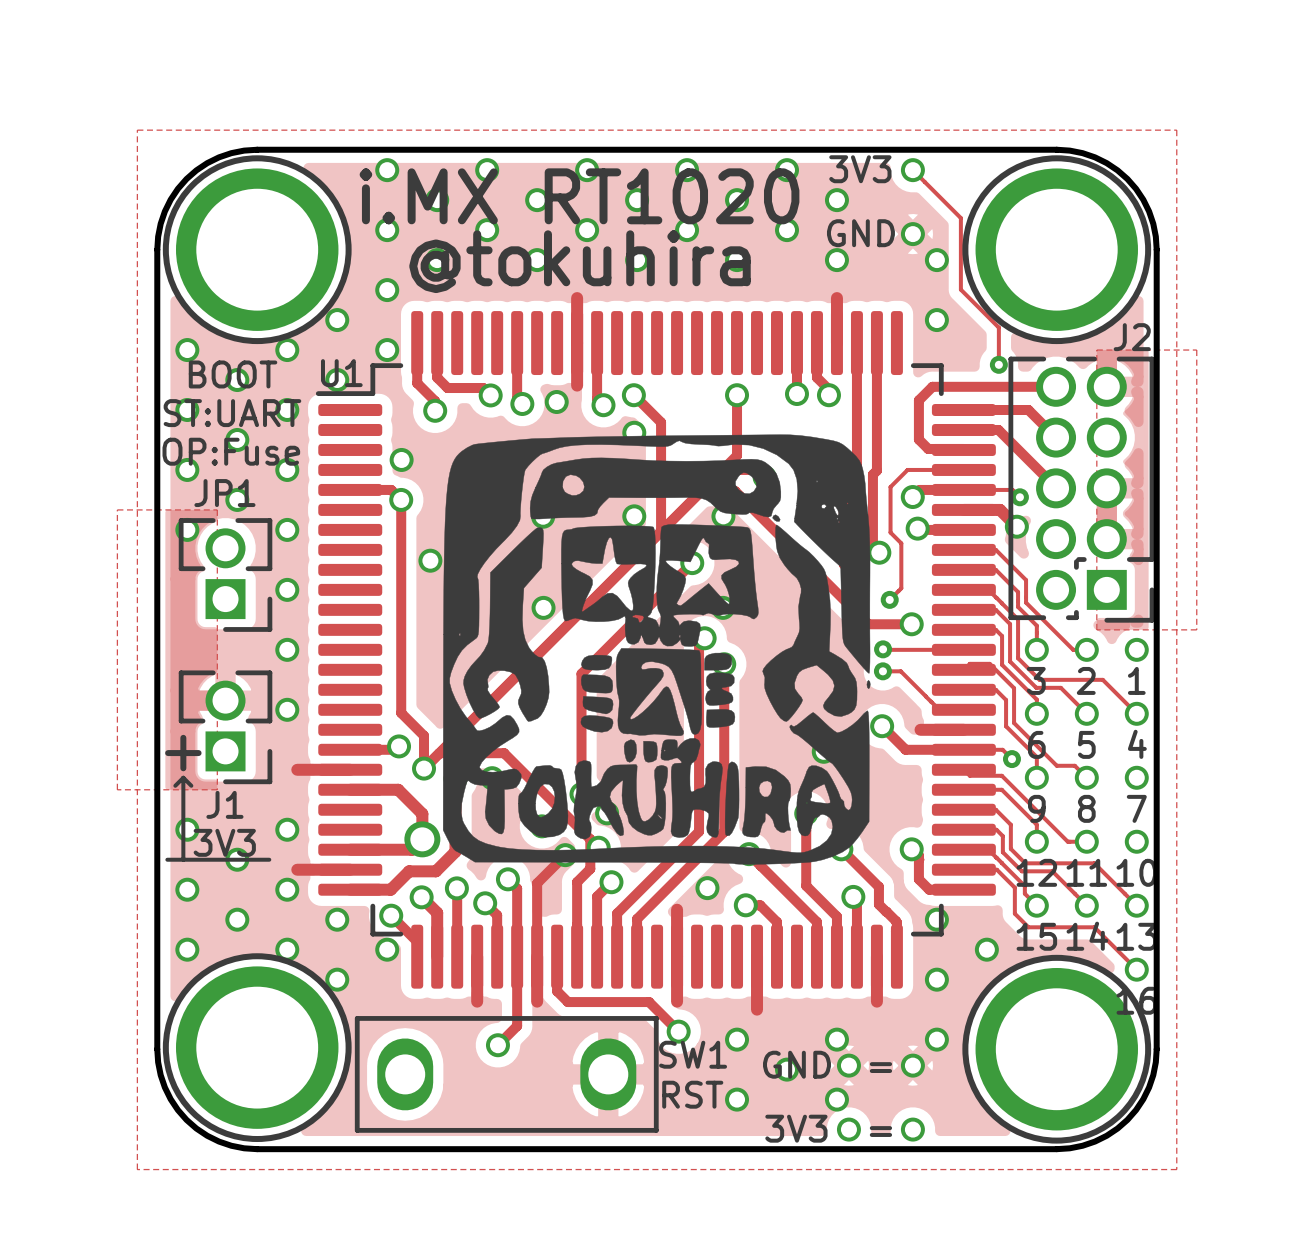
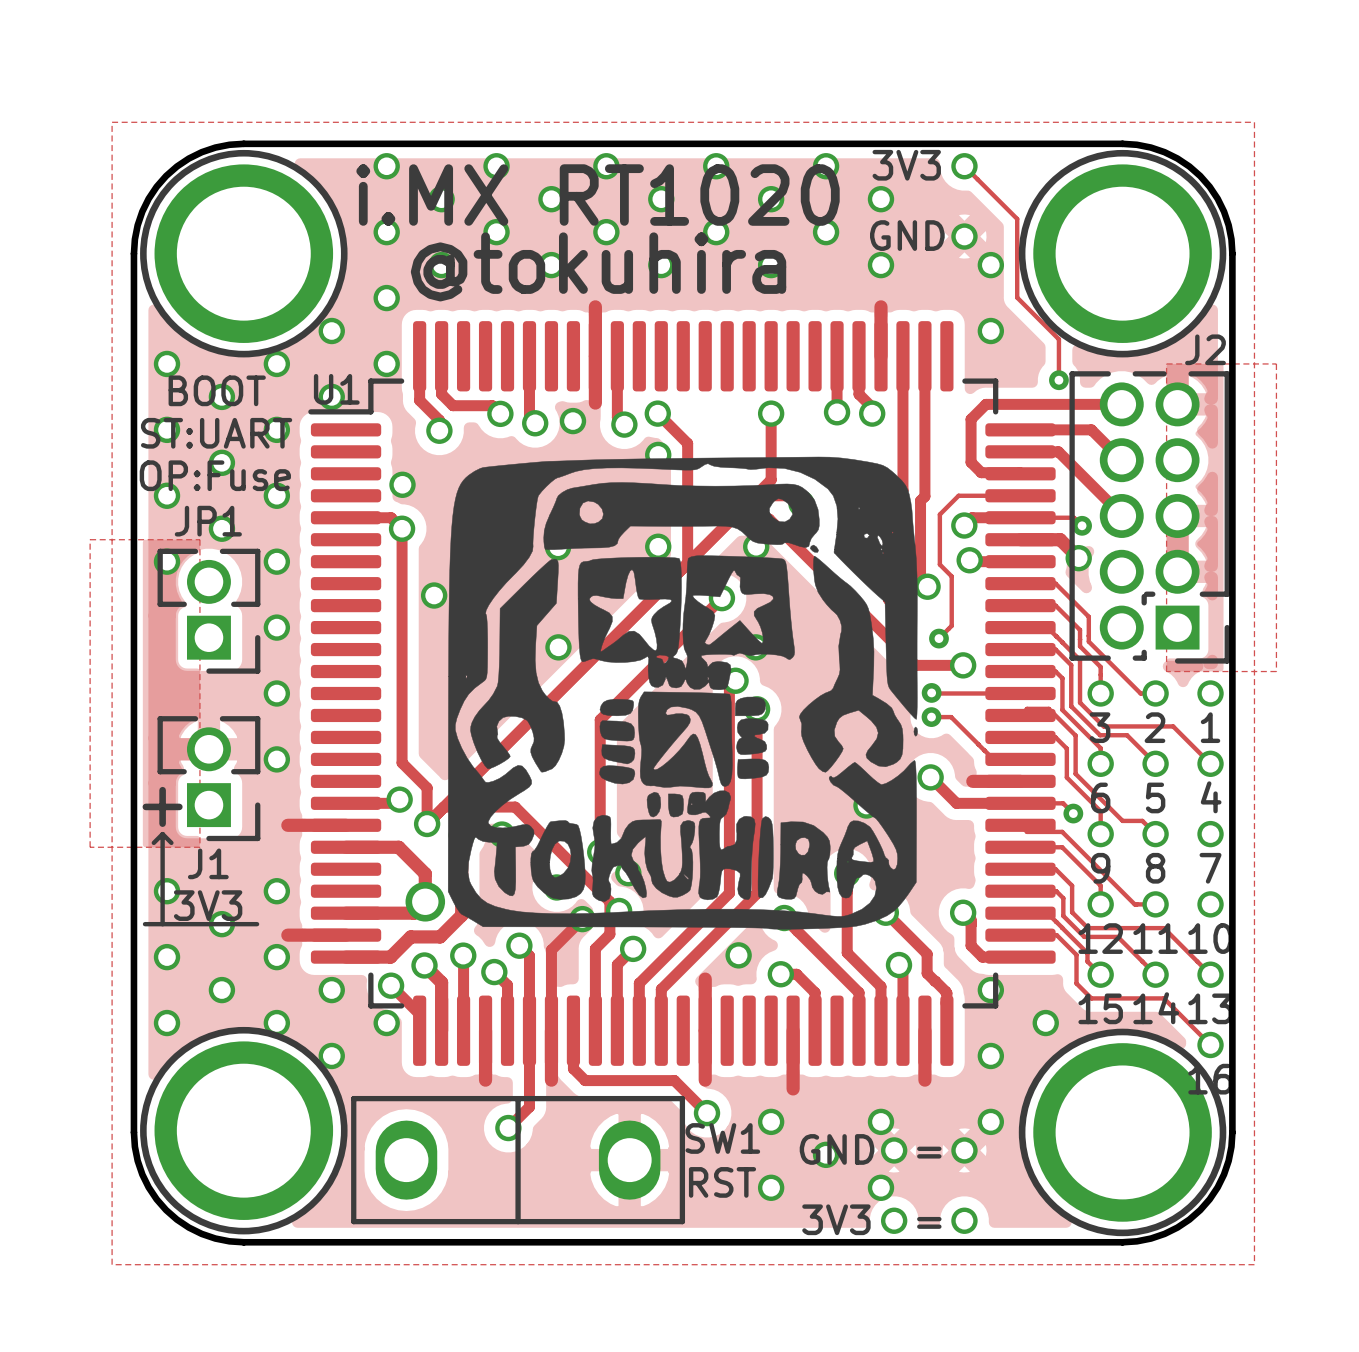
SW1 footprint: [354, 1016, 659, 1133] -> [351, 1095, 686, 1225]

